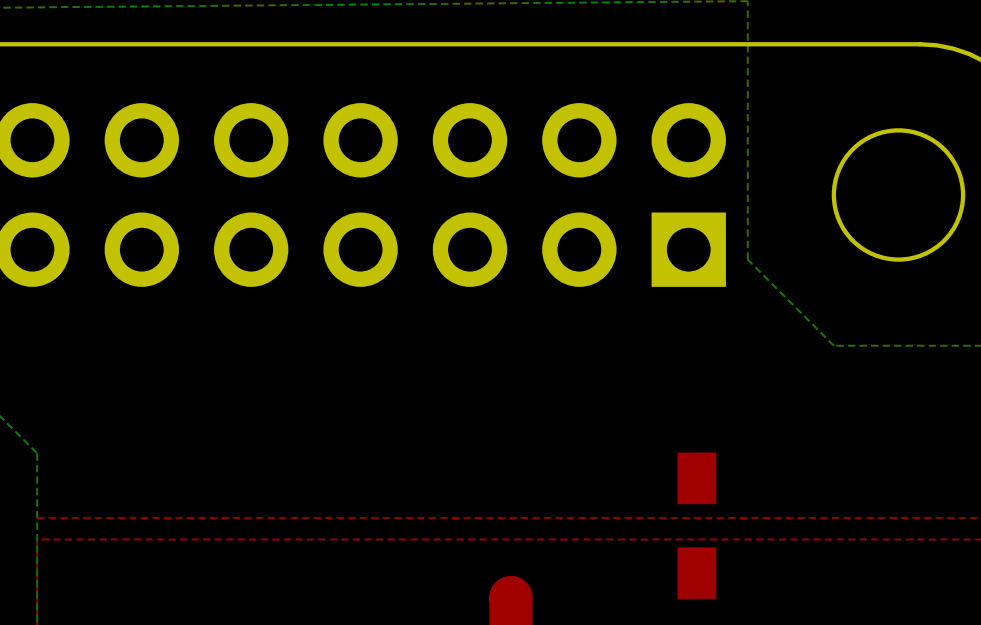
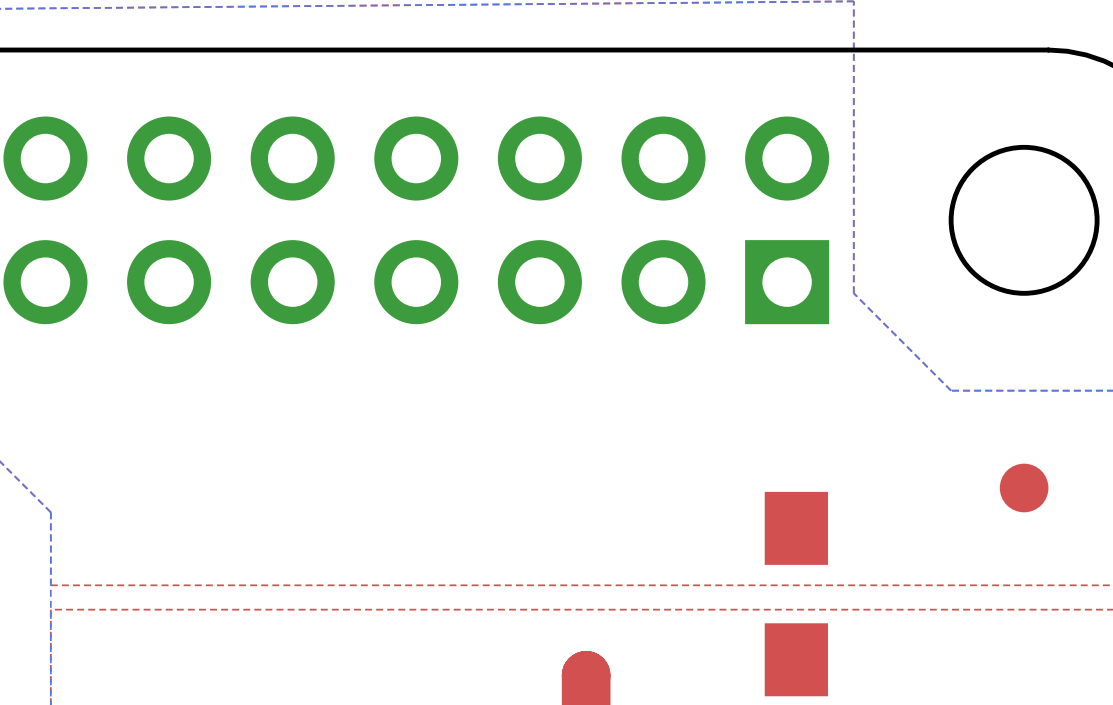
part: none -> (1024, 487)
part footprint: [677, 452, 717, 599] -> [764, 491, 829, 697]

